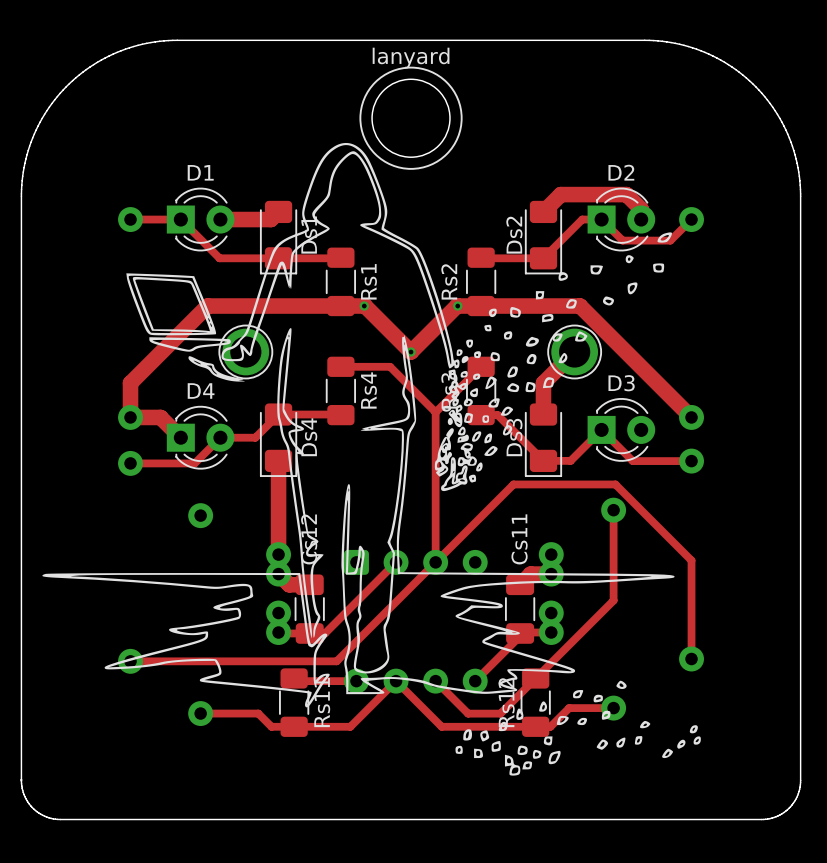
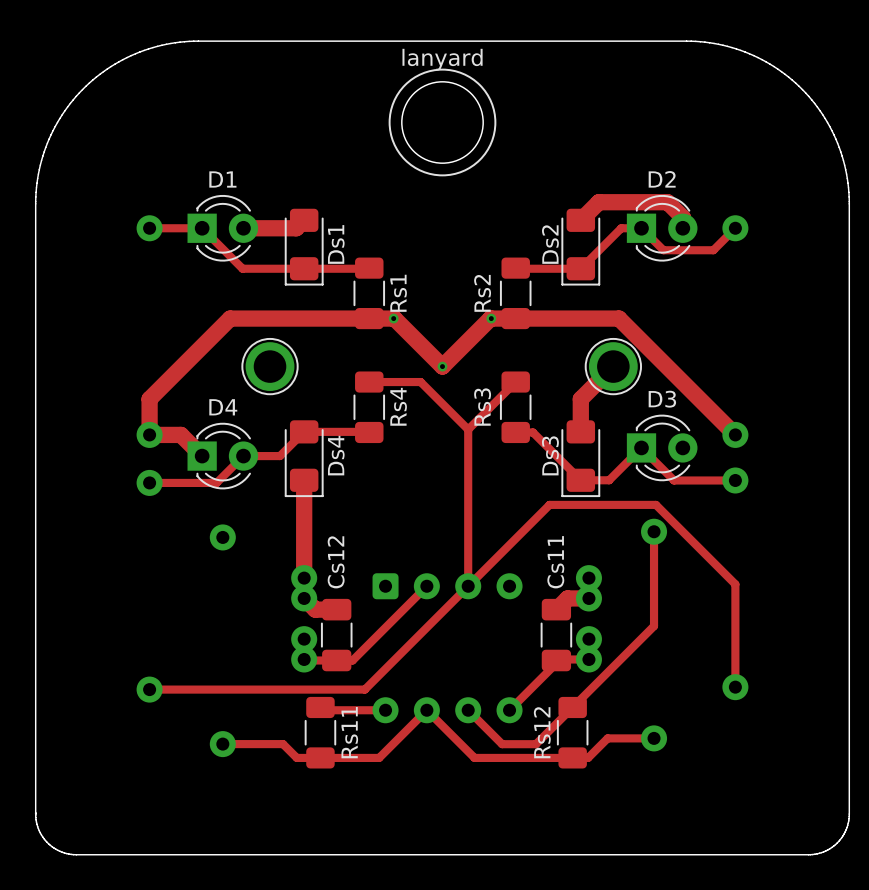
drawing: [42, 142, 675, 776] -> none
drawing: [657, 232, 672, 243] -> none
drawing: [625, 255, 634, 264] -> none
drawing: [602, 263, 665, 306] -> none
drawing: [590, 265, 603, 275] -> none
drawing: [662, 725, 701, 759] -> none

